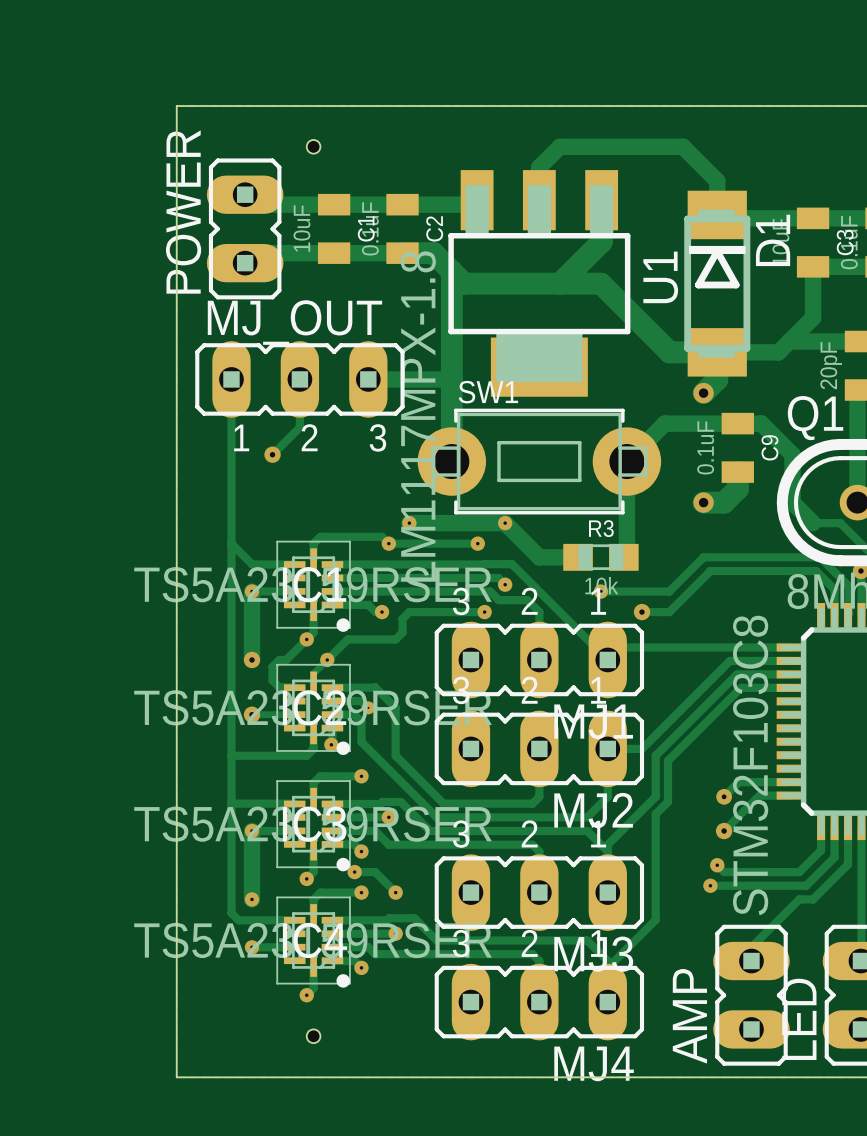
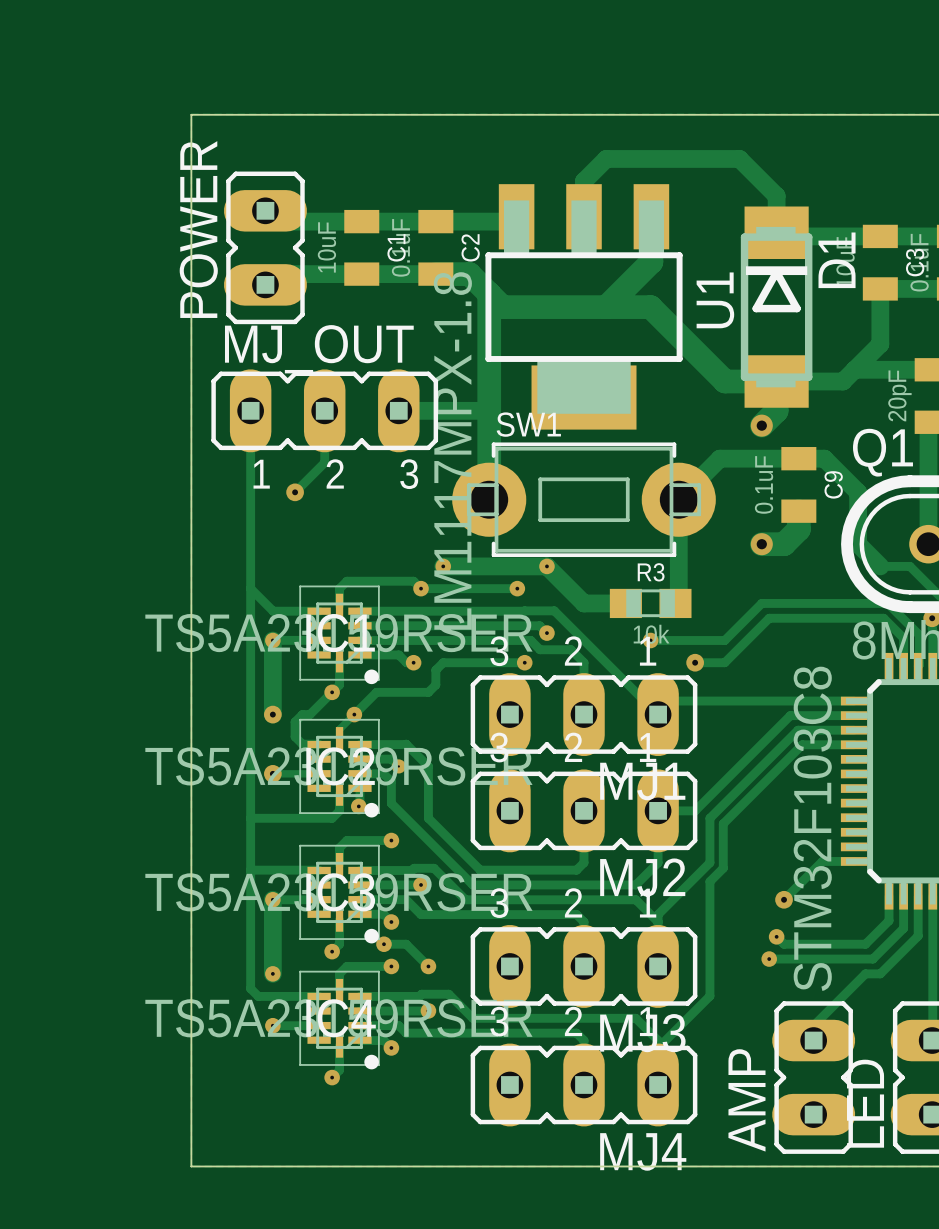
hole: (313, 146) -> none
track: (788, 782) (738, 782) (724, 796) -> none
via: (724, 796) -> none
hole: (313, 1036) -> none

